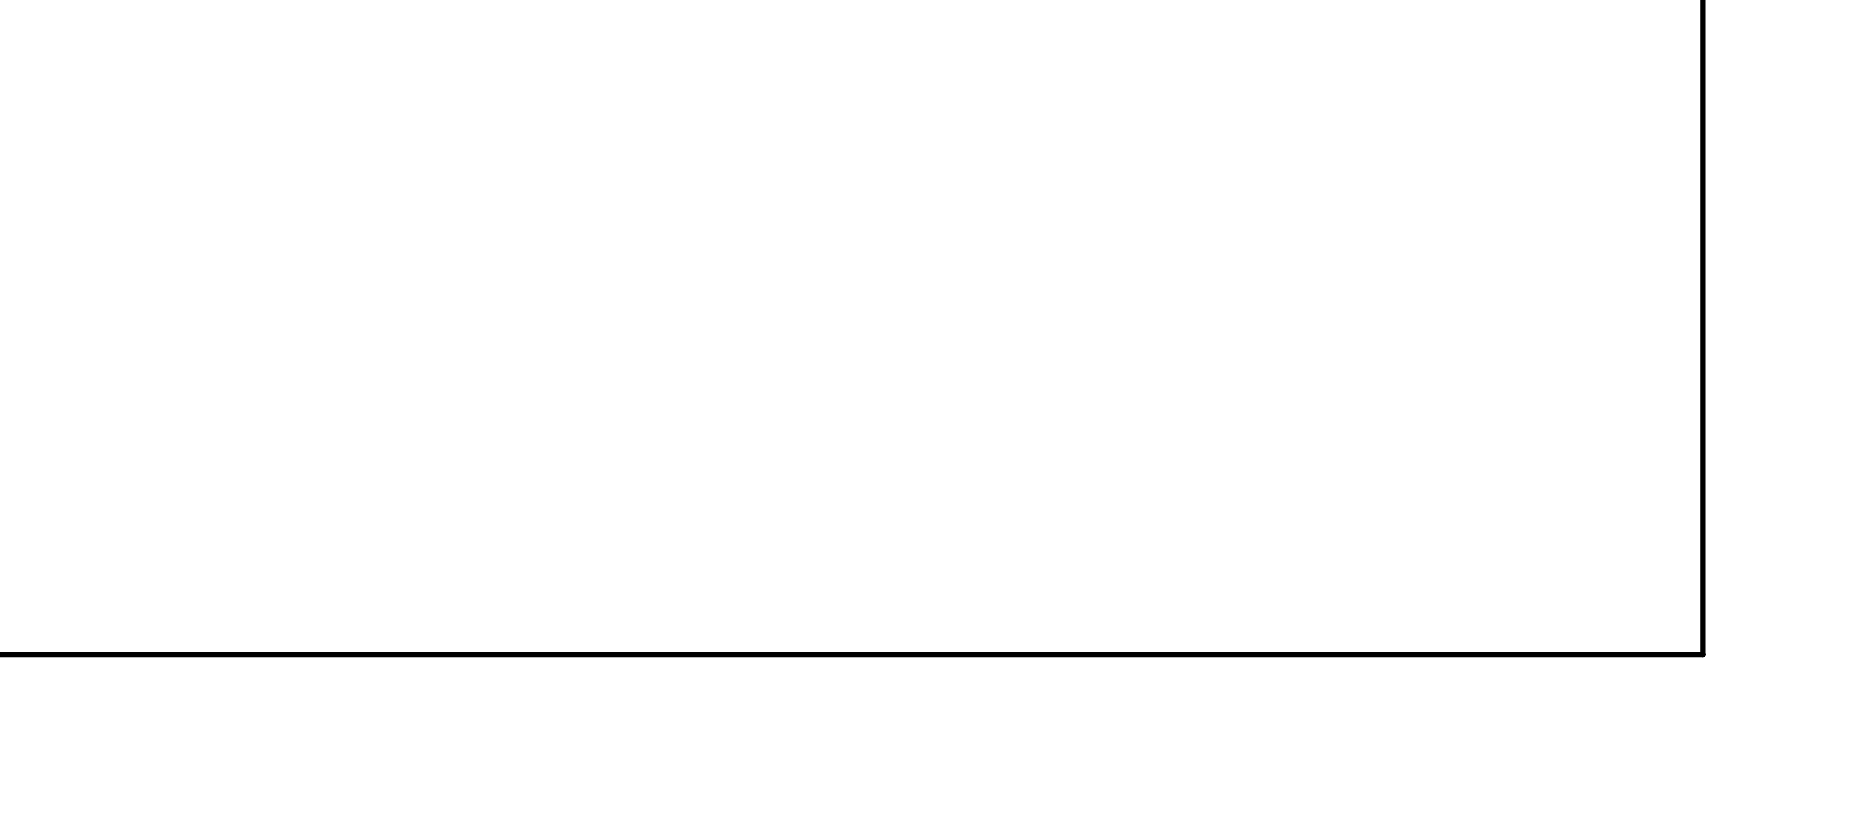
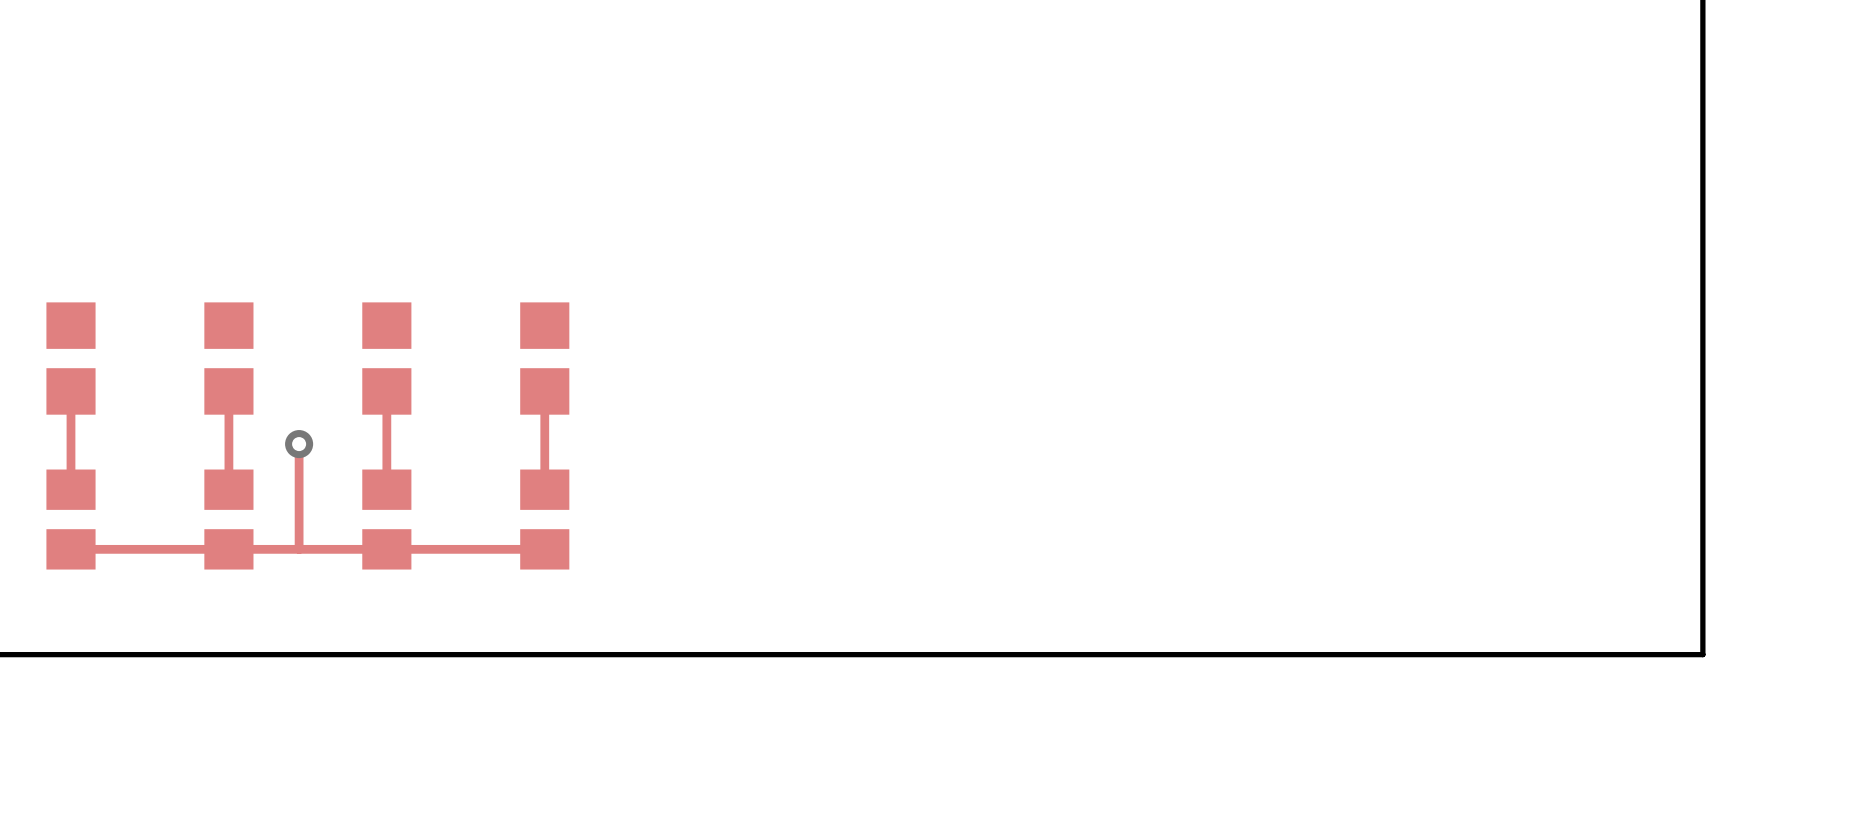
part: none -> (70, 358)
part: none -> (228, 358)
part: none -> (386, 358)
part: none -> (544, 358)
top track: none -> (70, 391) (70, 489)
top track: none -> (228, 391) (228, 489)
top track: none -> (386, 391) (386, 489)
top track: none -> (544, 391) (544, 489)
top track: none -> (299, 444) (299, 549)
via: none -> (299, 444)
part: none -> (70, 519)
part: none -> (228, 519)
part: none -> (386, 519)
part: none -> (544, 519)
top track: none -> (544, 549) (70, 549)

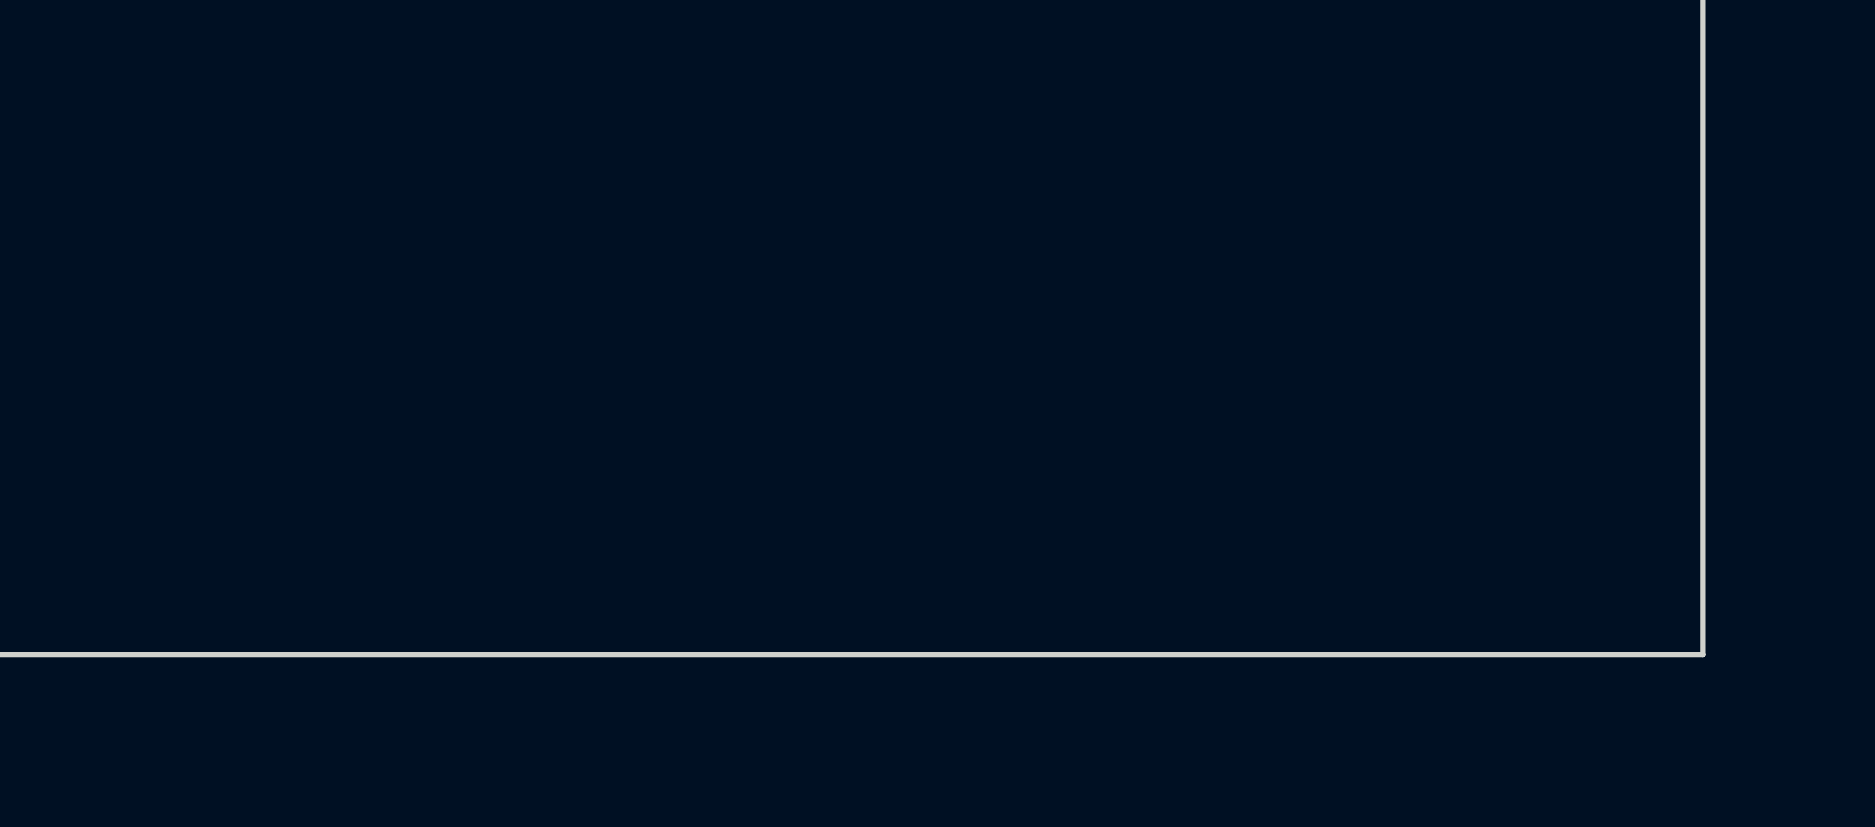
part: (70, 358) -> none
part: (228, 358) -> none
part: (386, 358) -> none
part: (544, 358) -> none
top track: (70, 391) (70, 489) -> none
top track: (228, 391) (228, 489) -> none
top track: (386, 391) (386, 489) -> none
top track: (544, 391) (544, 489) -> none
top track: (299, 444) (299, 549) -> none
via: (299, 444) -> none
part: (70, 519) -> none
part: (228, 519) -> none
part: (386, 519) -> none
part: (544, 519) -> none
top track: (544, 549) (70, 549) -> none

